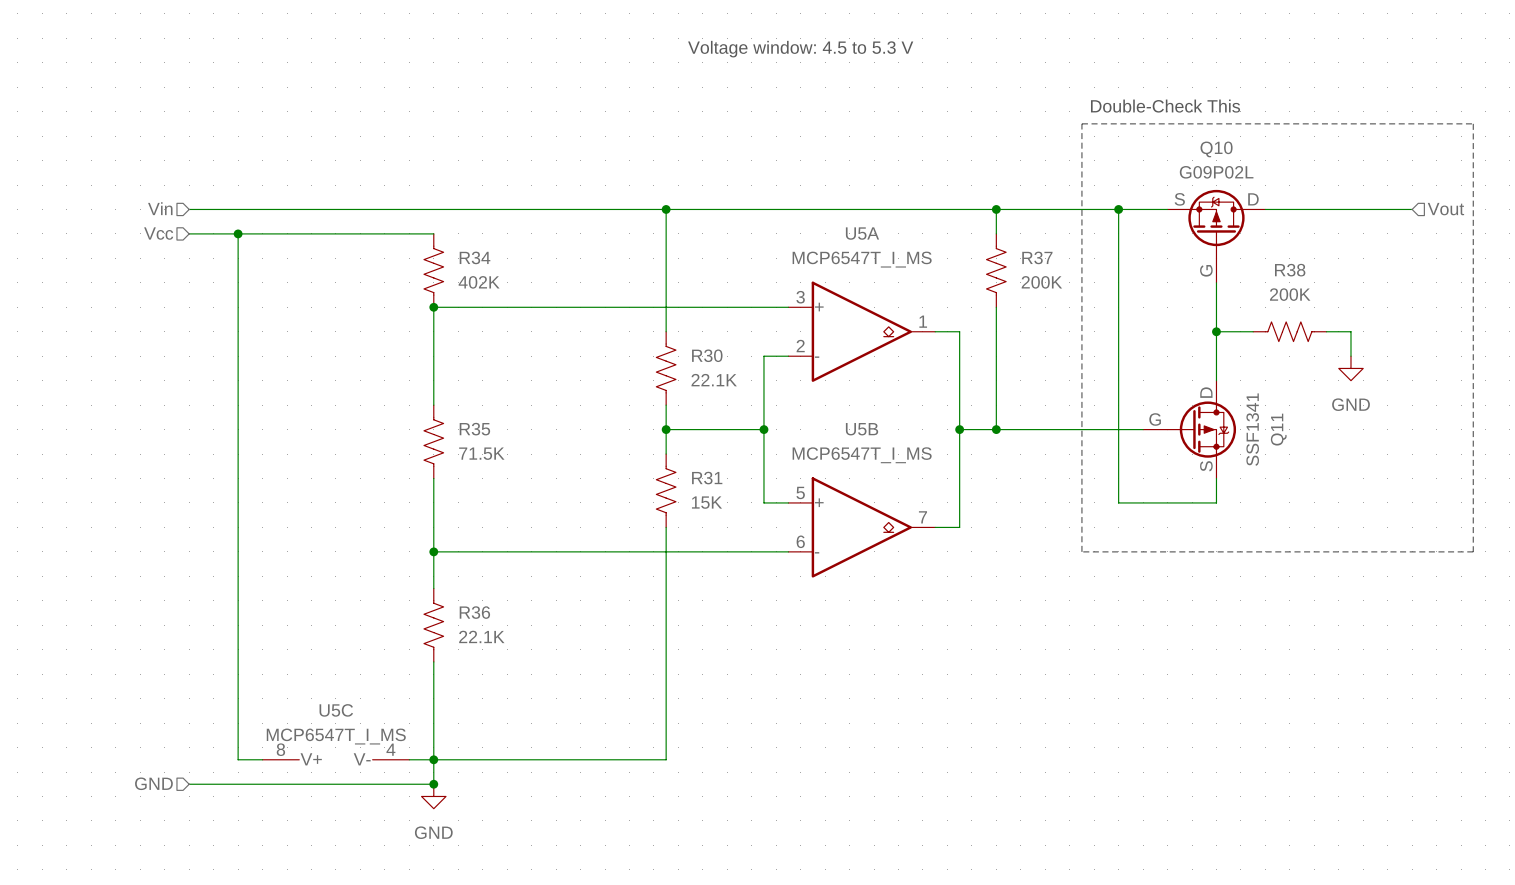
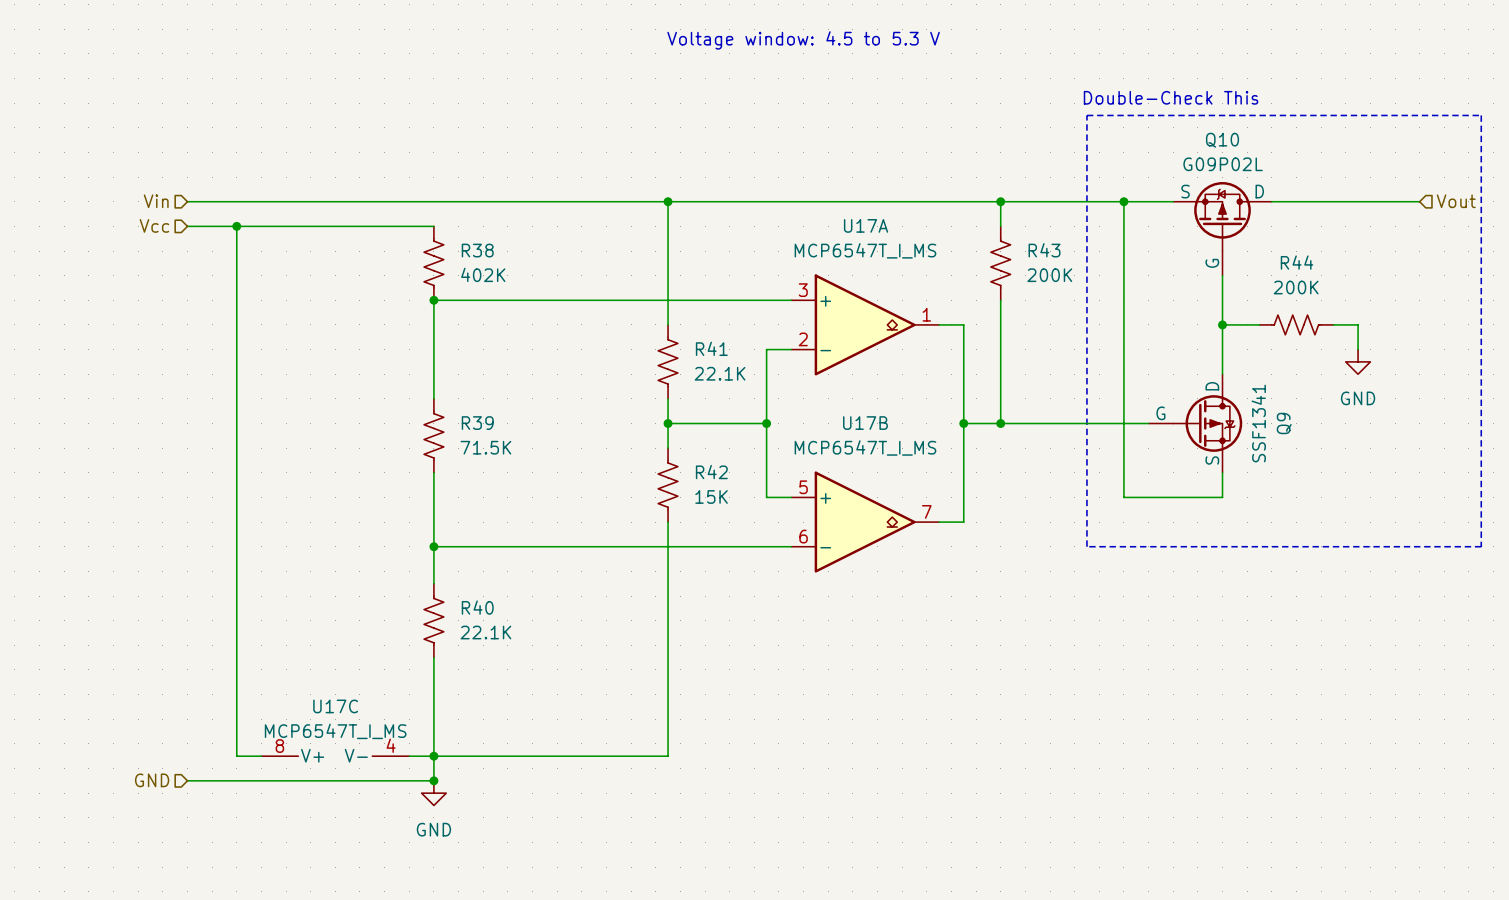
U5A name: U5A (862, 233) -> U17A (866, 225)
R34 name: R34 (475, 257) -> R38 (477, 250)
R37 name: R37 (1037, 257) -> R43 (1044, 250)
R38 name: R38 (1290, 270) -> R44 (1297, 262)
R30 name: R30 (707, 355) -> R41 (711, 348)
R35 name: R35 (474, 429) -> R39 (477, 423)
U5B name: U5B (862, 429) -> U17B (865, 423)
Q11 name: Q11 (1278, 429) -> Q9 (1284, 423)
R31 name: R31 (707, 478) -> R42 (711, 472)
R36 name: R36 (474, 612) -> R40 (477, 607)
U5C name: U5C (336, 710) -> U17C (335, 706)

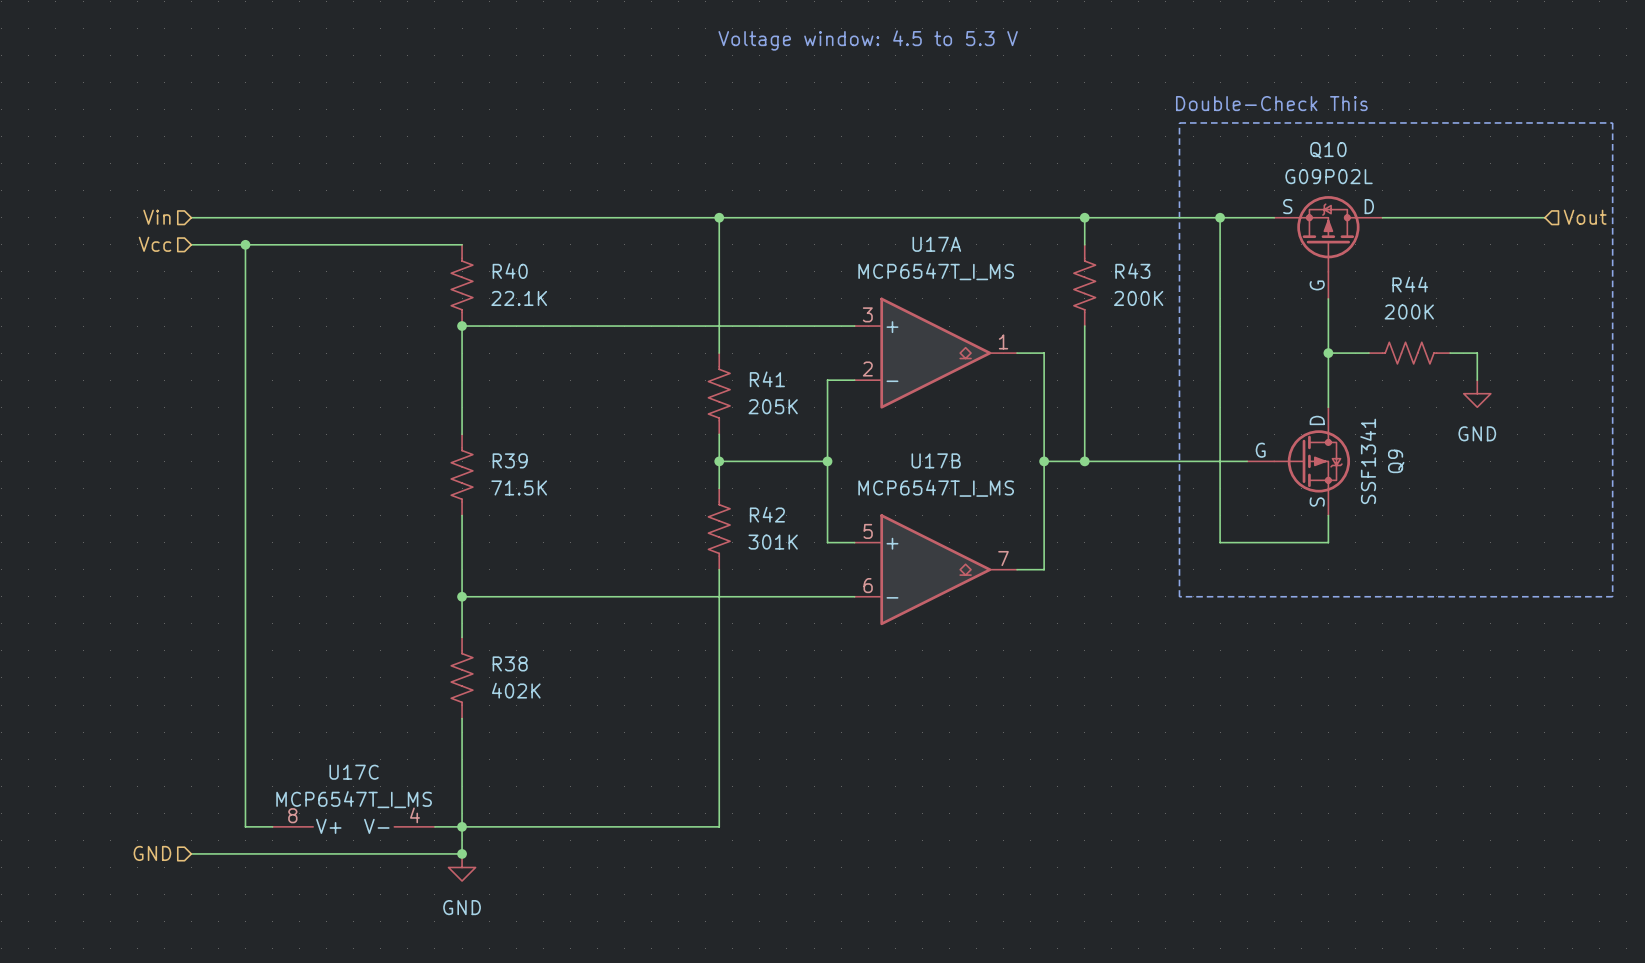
R38 name: R38 (477, 250) -> R40 (510, 271)
R38 value: 402K (483, 274) -> 22.1K (519, 298)
R41 value: 22.1K (720, 373) -> 205K (773, 406)
R42 value: 15K (711, 496) -> 301K (773, 542)
R40 name: R40 (477, 607) -> R38 (510, 663)
R40 value: 22.1K (485, 632) -> 402K (516, 690)

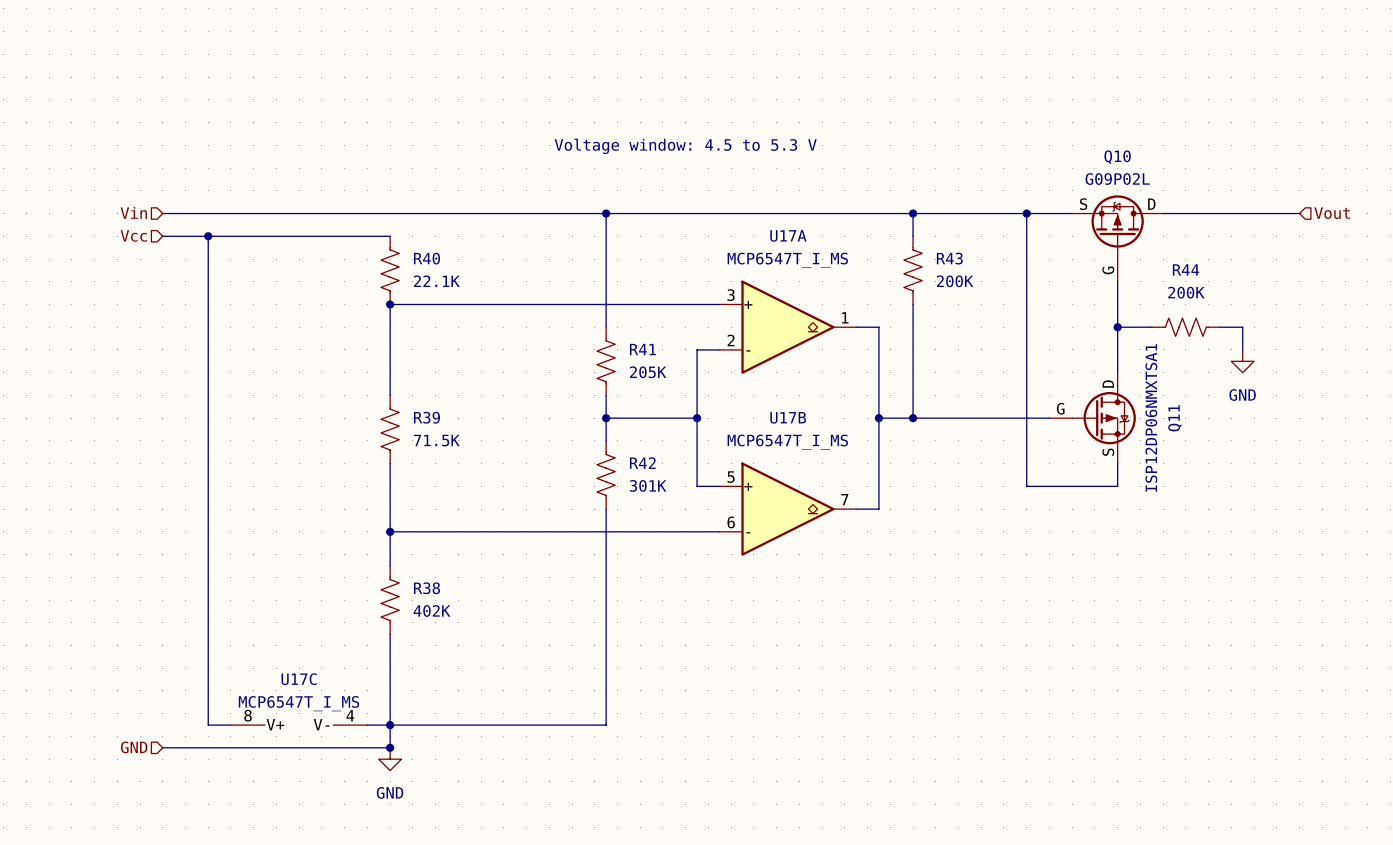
text position: Voltage window: 4.5 to 5.3 V (868, 40) -> Voltage window: 4.5 to 5.3 V (685, 146)
text: Double-Check This (1271, 103) -> none
line: (1179, 122) (1612, 122) (1612, 596) (1179, 596) (1179, 122) -> none
Q9 value: SSF1341 (1368, 461) -> ISP12DP06NMXTSA1 (1151, 417)
Q9 name: Q9 (1396, 461) -> Q11 (1174, 418)

